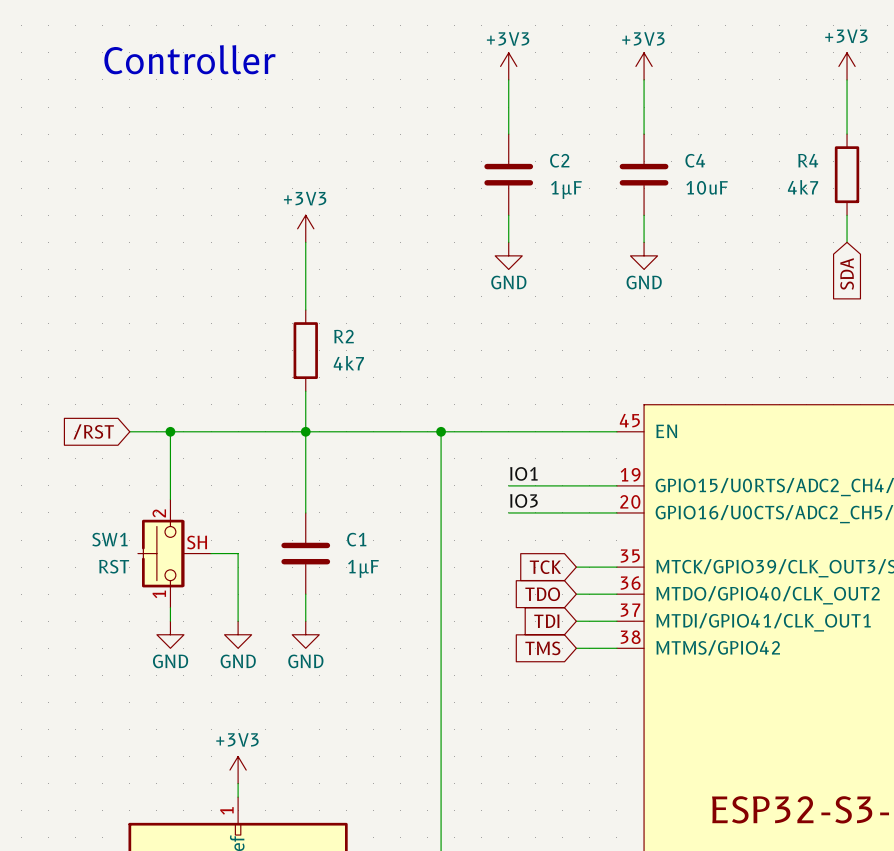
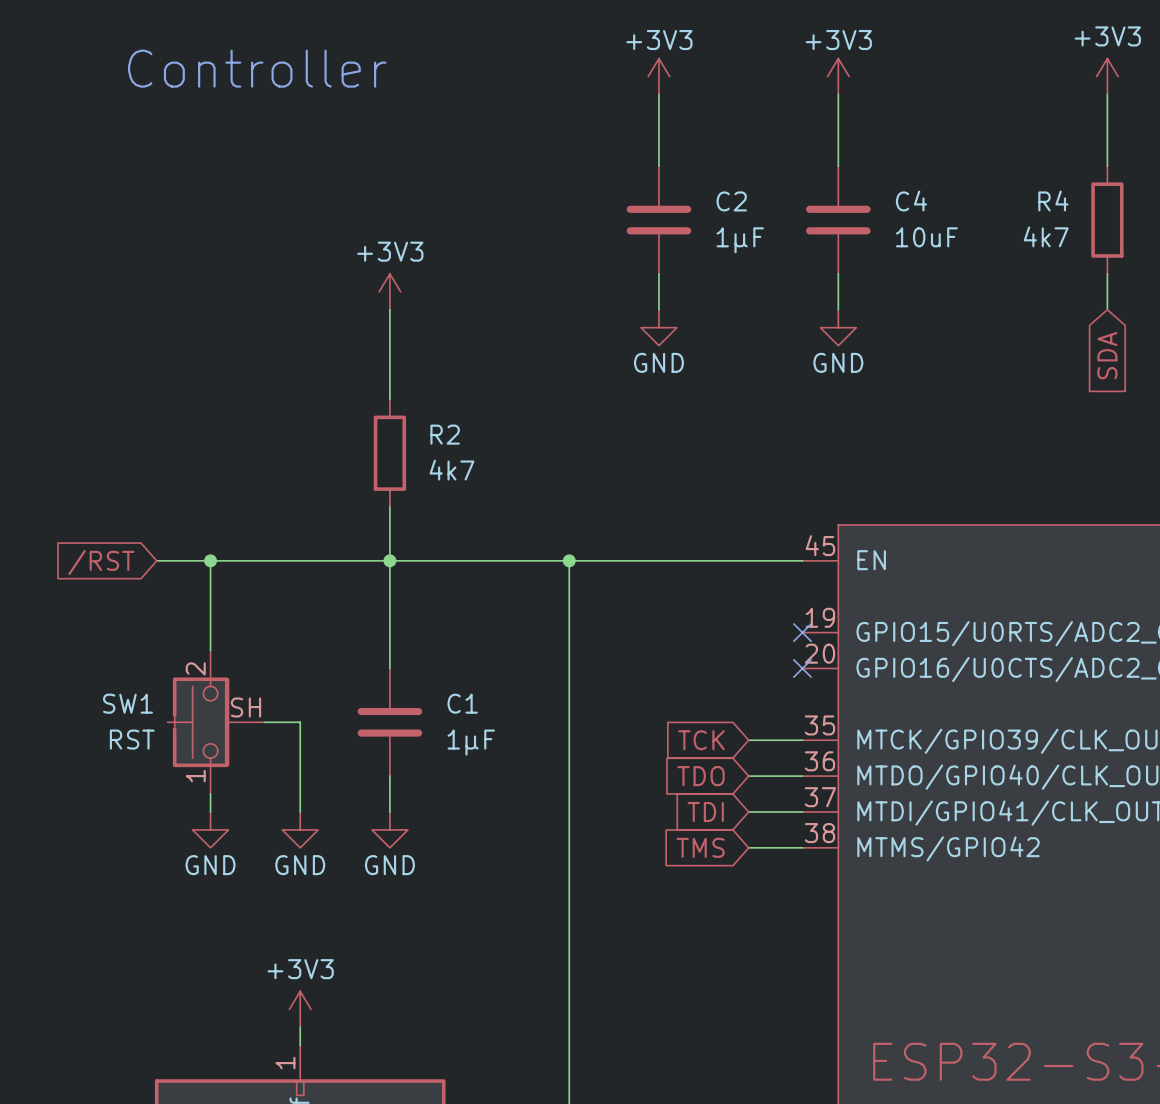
label: IO1 (523, 473) -> none
wire: (508, 485) (616, 485) -> none
no-connect mark: none -> (802, 632)
label: IO3 (523, 500) -> none
wire: (508, 512) (616, 512) -> none
no-connect mark: none -> (802, 668)

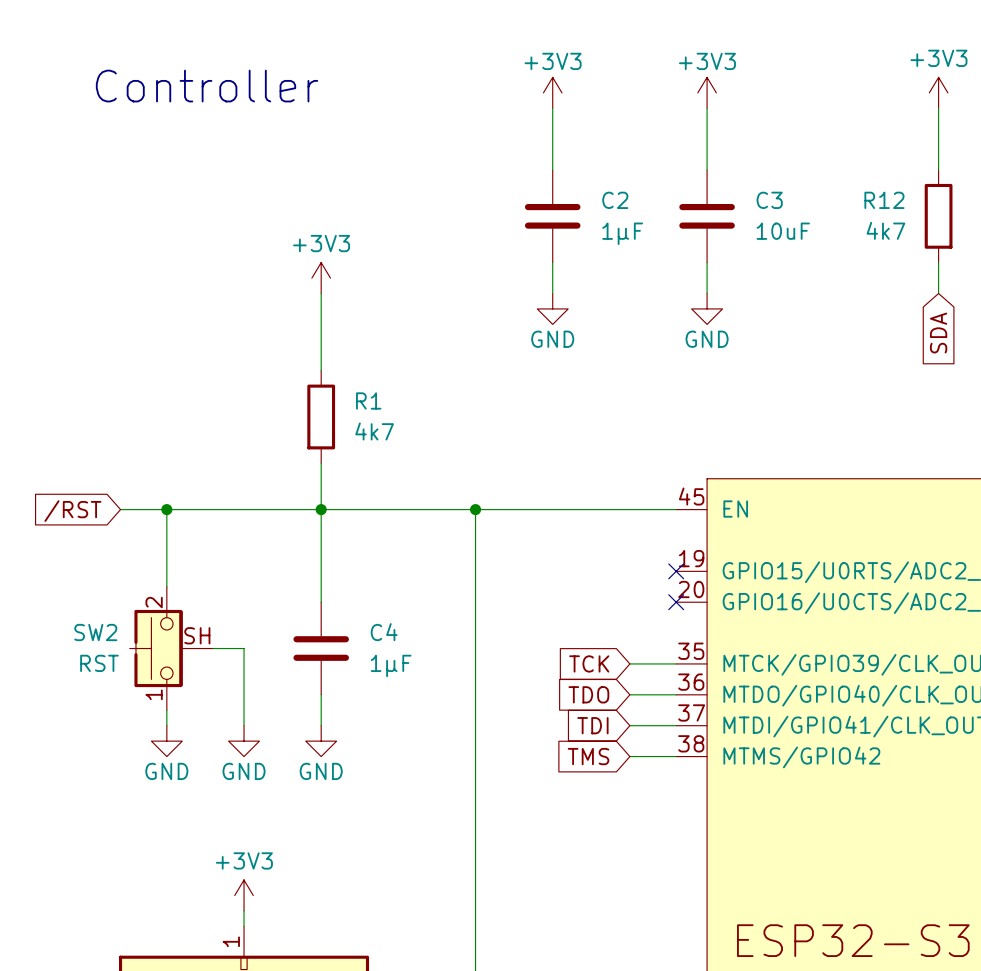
C4 name: C4 (911, 201) -> C3 (769, 200)
R4 name: R4 (1053, 201) -> R12 (884, 200)
R2 name: R2 (445, 434) -> R1 (368, 400)
SW1 name: SW1 (127, 703) -> SW2 (95, 632)
C1 name: C1 (462, 703) -> C4 (384, 632)

